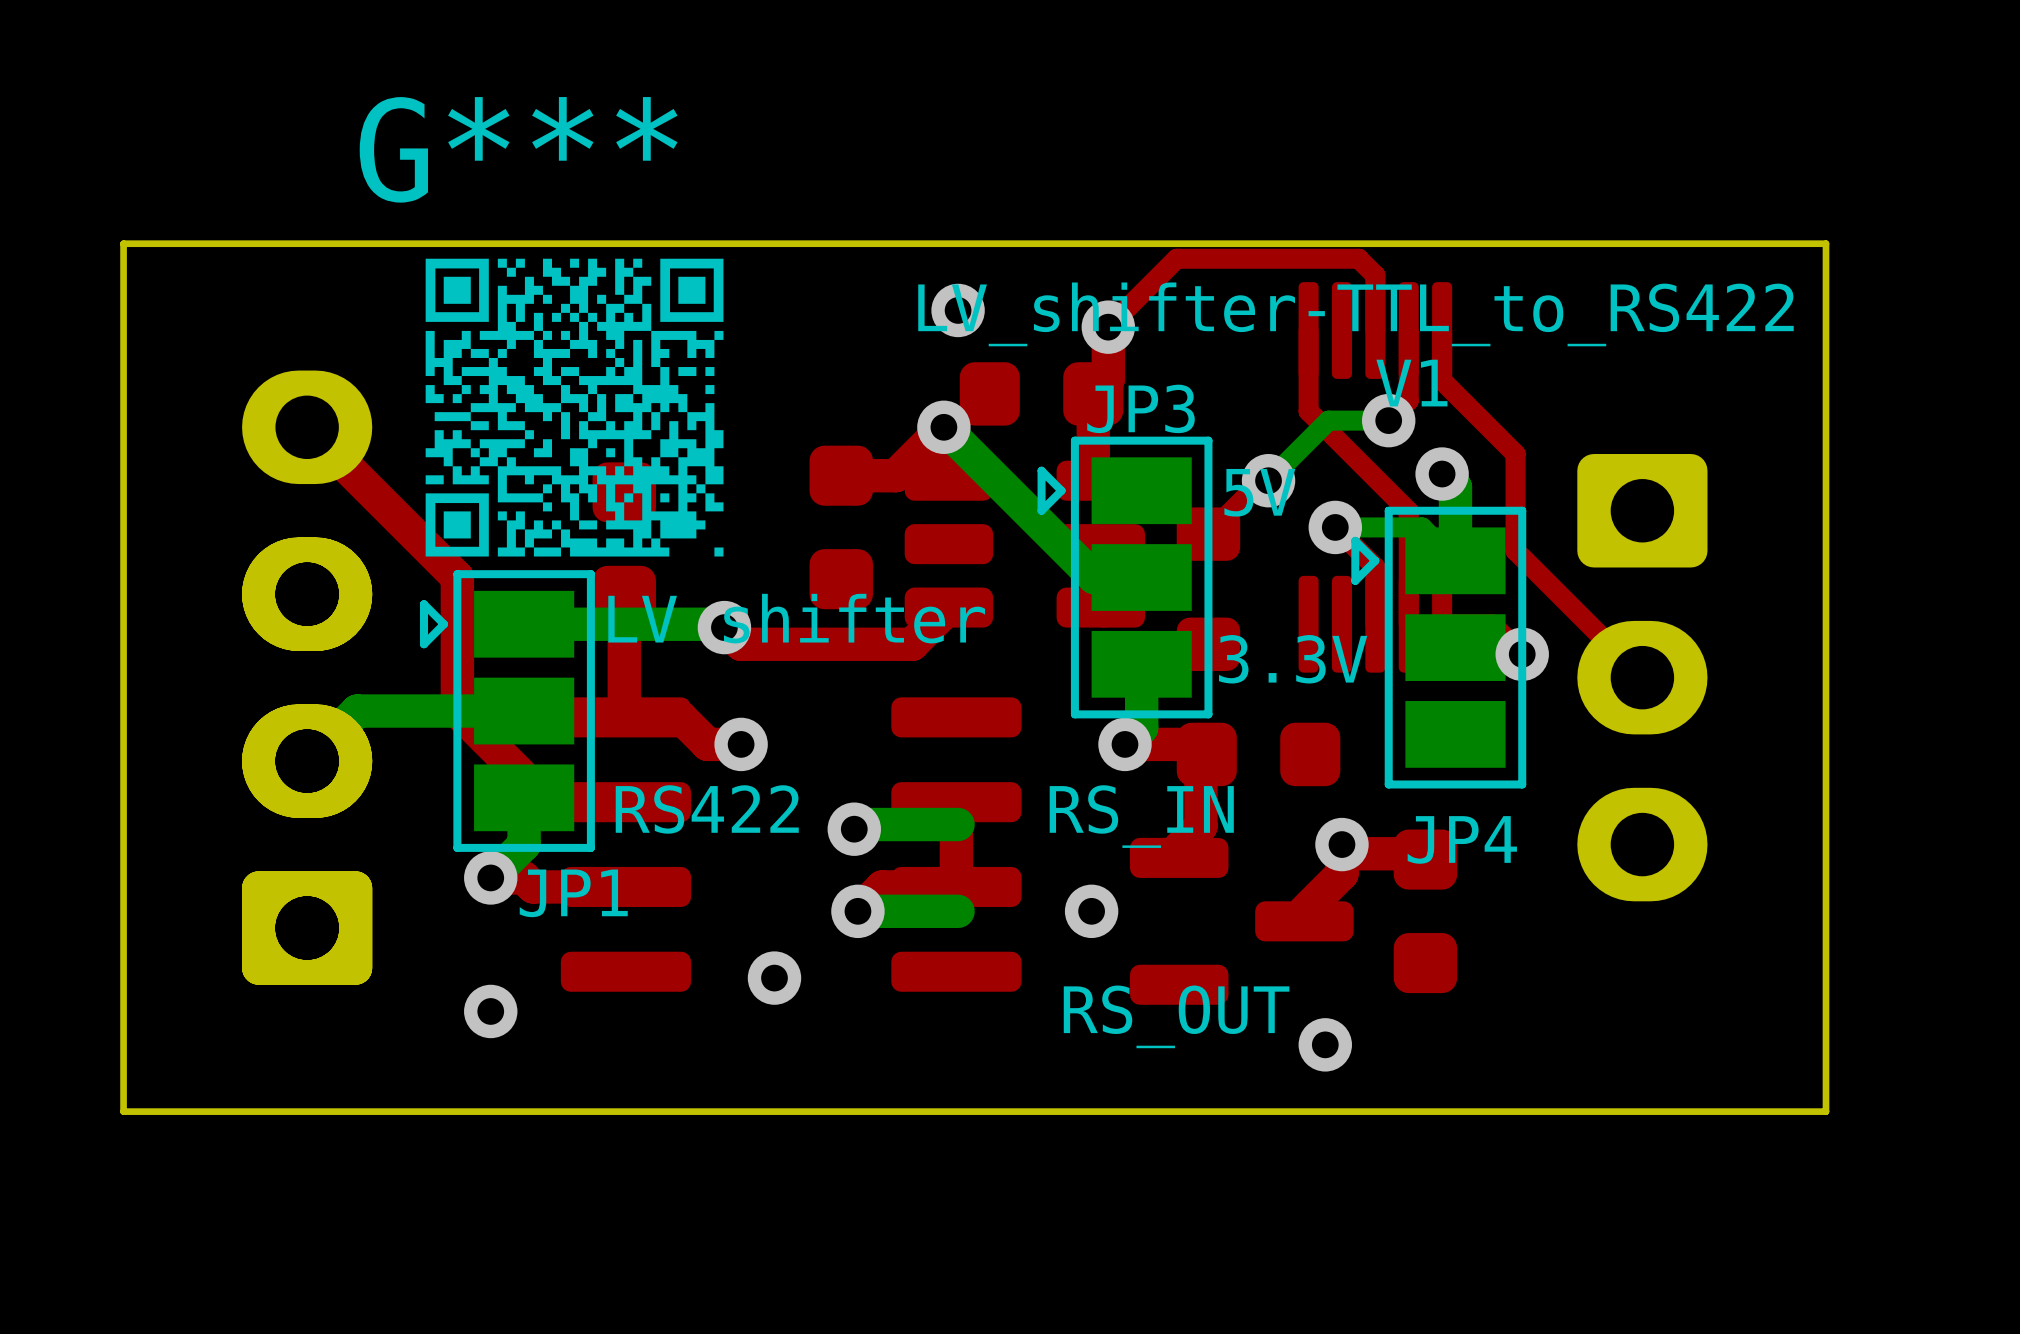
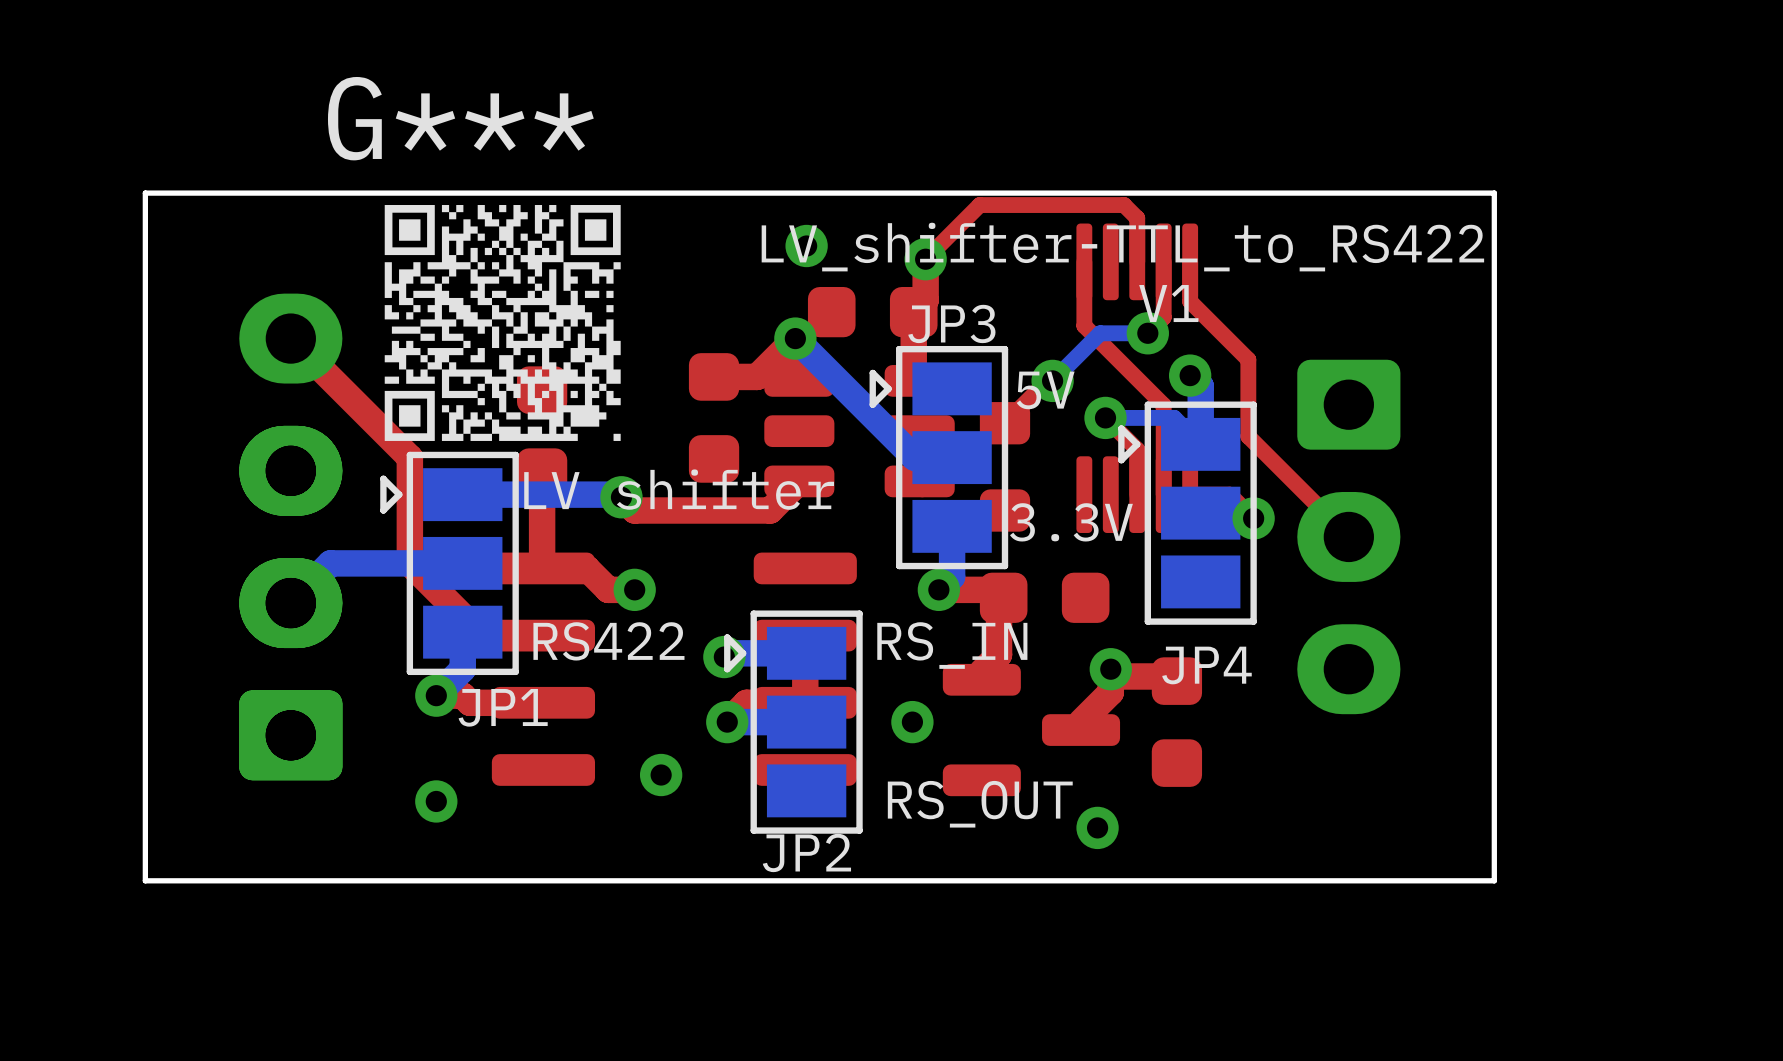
JP2: none -> (793, 722)

